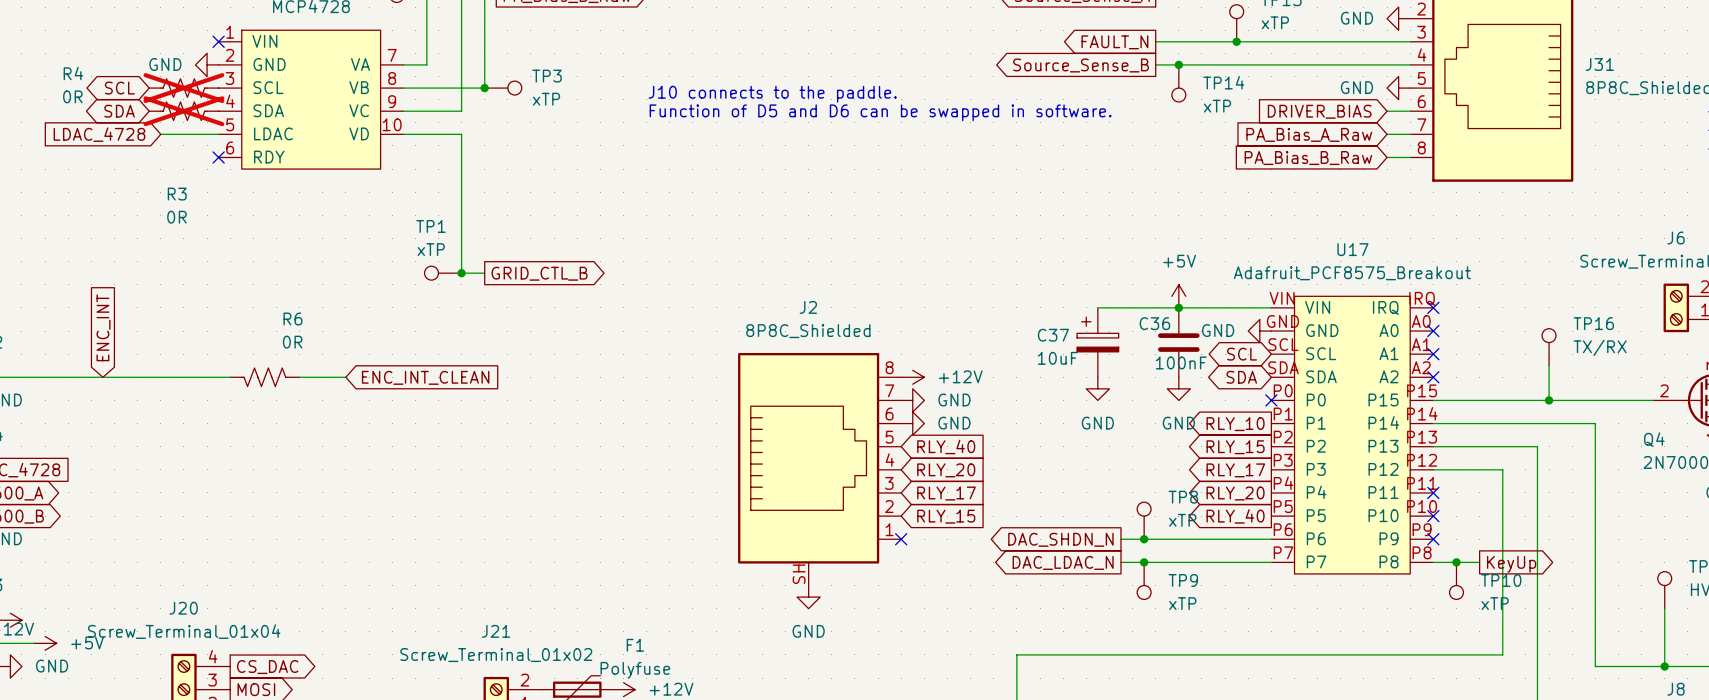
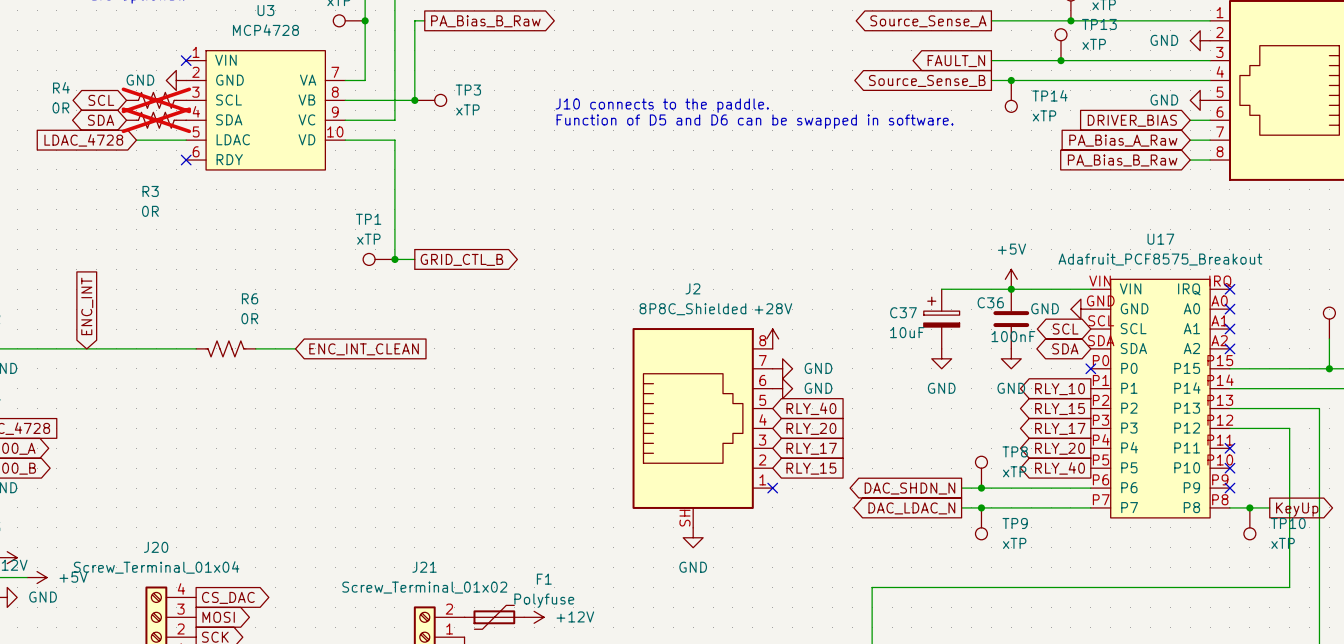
power symbol: none -> +28V (772, 338)
power symbol: +12V (912, 377) -> none

